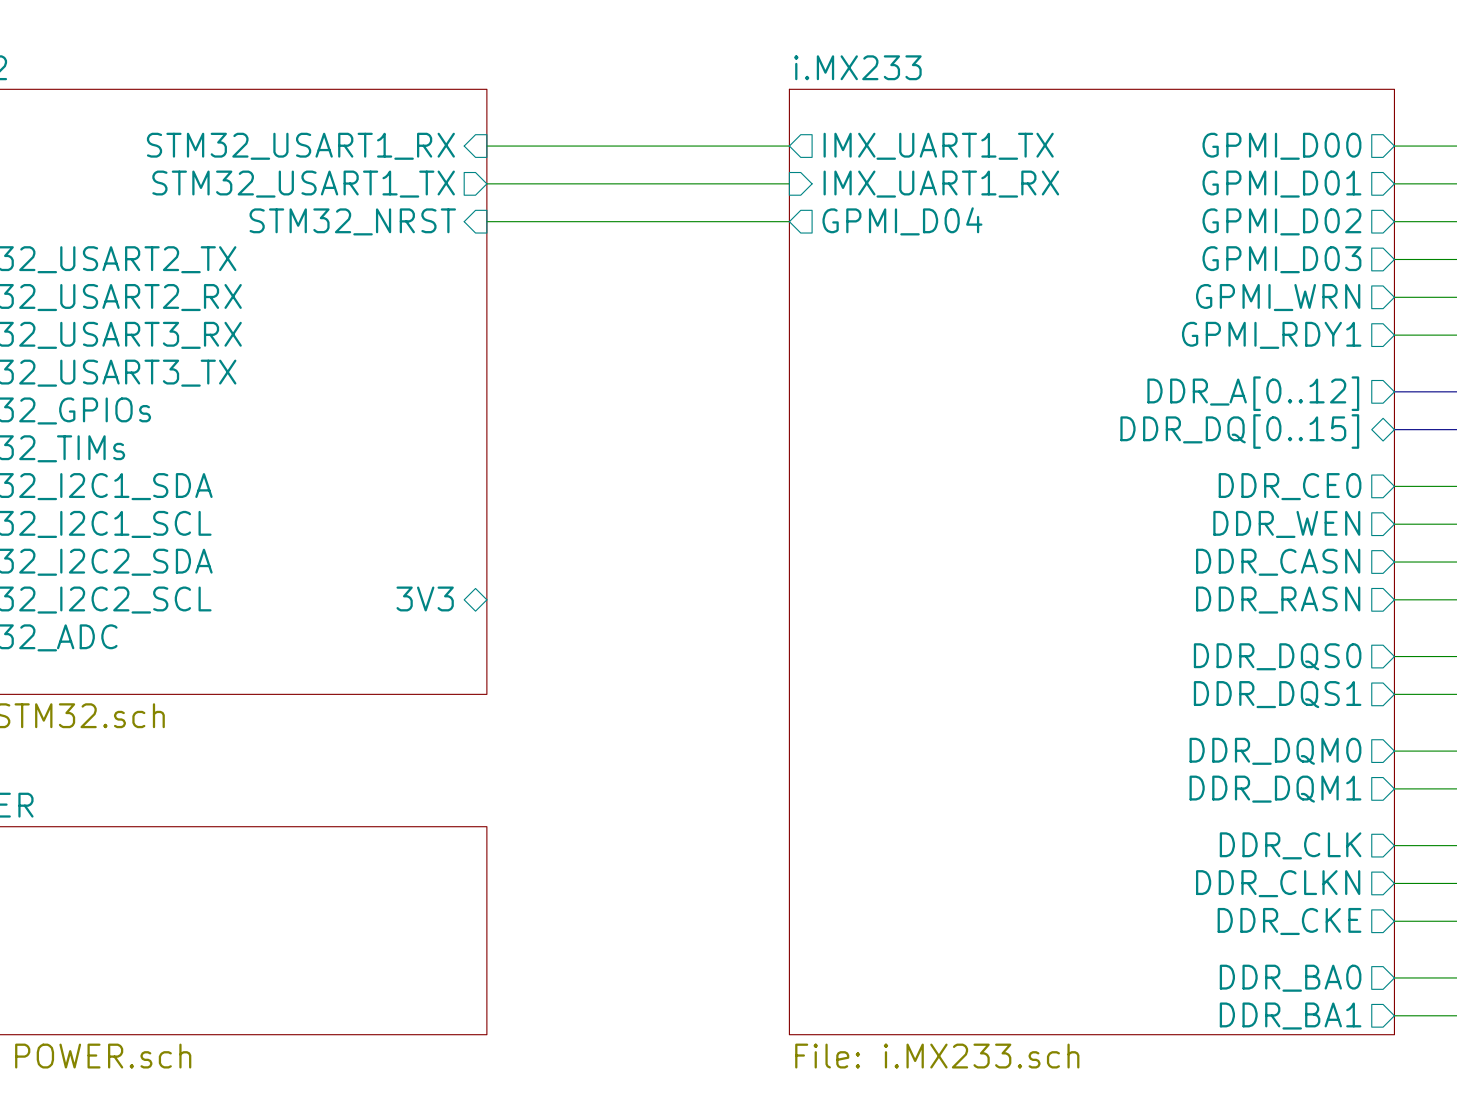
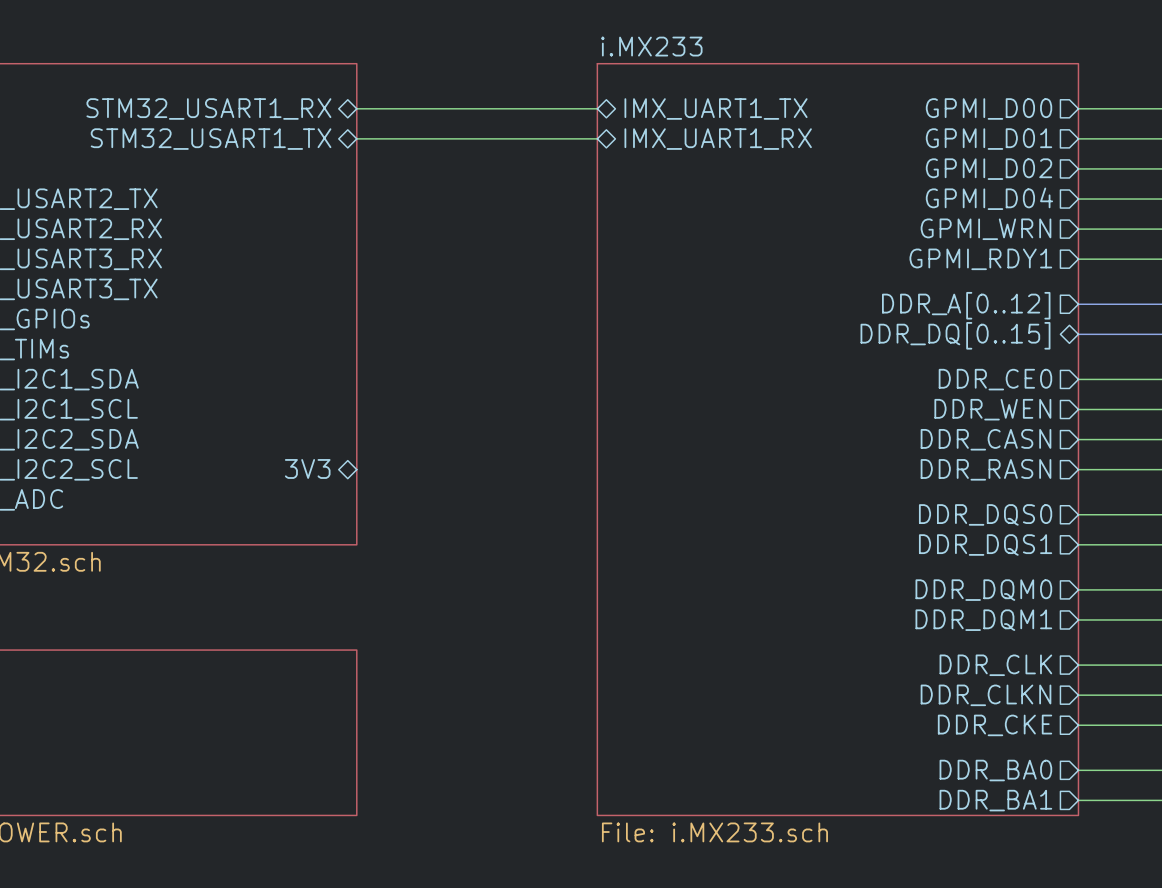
sheet pin shape: input (300, 146) -> bidirectional (208, 108)
sheet pin shape: output (938, 146) -> bidirectional (716, 108)
sheet pin shape: output (303, 184) -> bidirectional (211, 139)
sheet pin shape: input (941, 184) -> bidirectional (718, 139)
sheet pin: STM32_NRST (352, 221) -> none
wire: (486, 221) (789, 221) -> none
sheet pin: GPMI_D04 (902, 221) -> none
sheet pin: GPMI_D03 (1281, 259) -> GPMI_D04 (989, 198)

